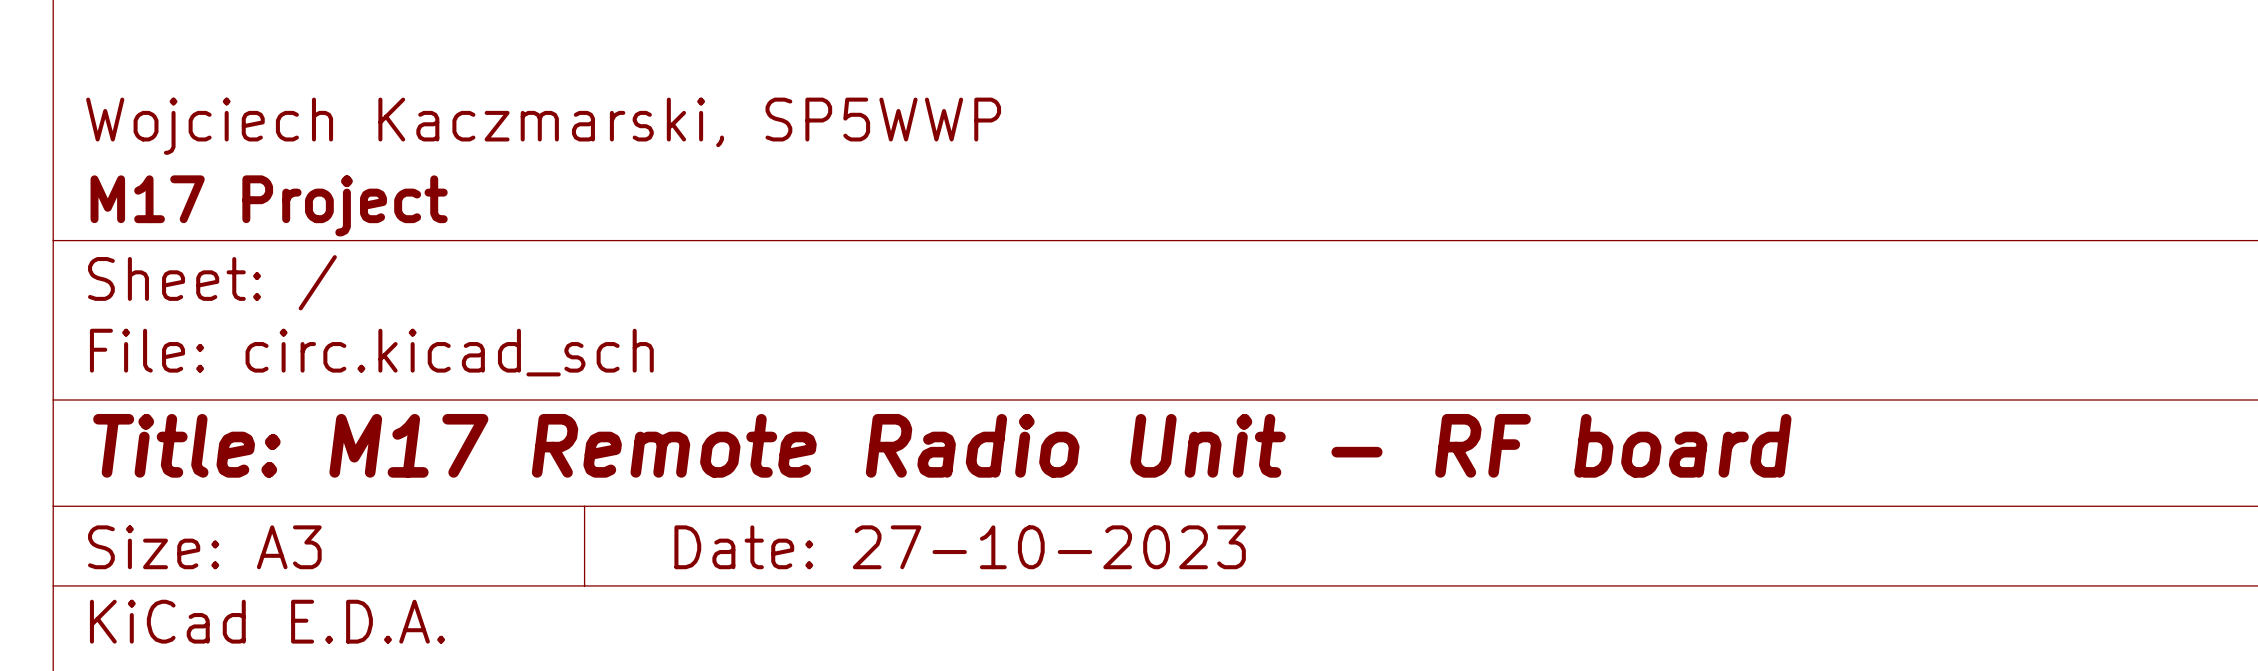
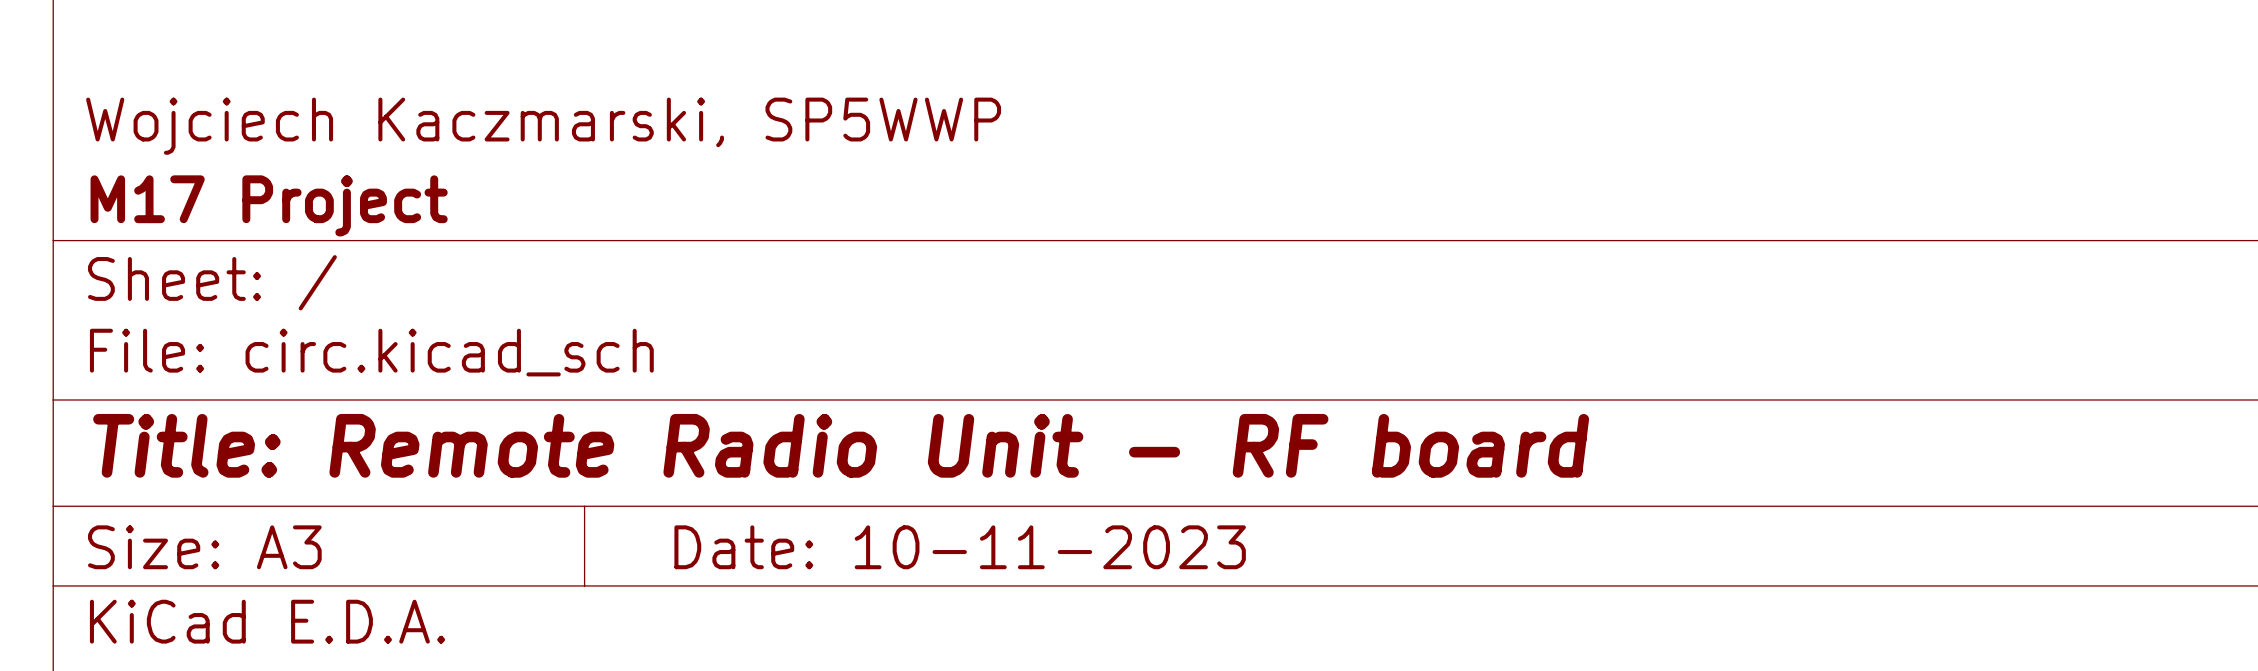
title block: Title: M17 Remote Radio Unit - RF board (942, 445) -> Title: Remote Radio Unit - RF board (841, 445)
title block: Date: 27-10-2023 (960, 547) -> Date: 10-11-2023 (960, 547)

